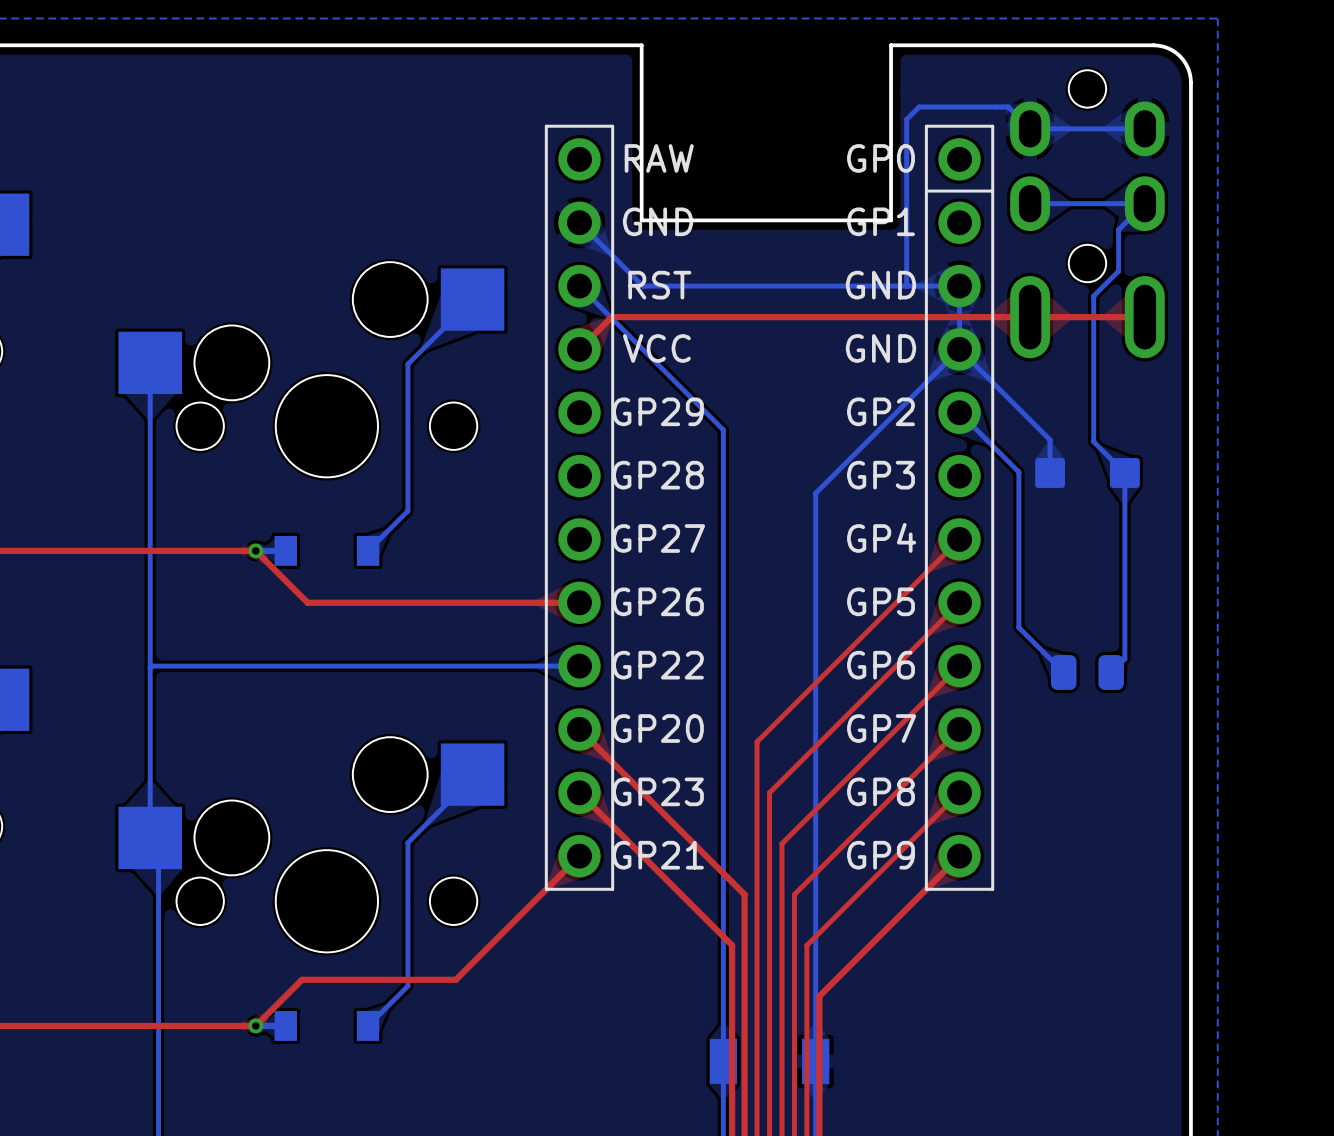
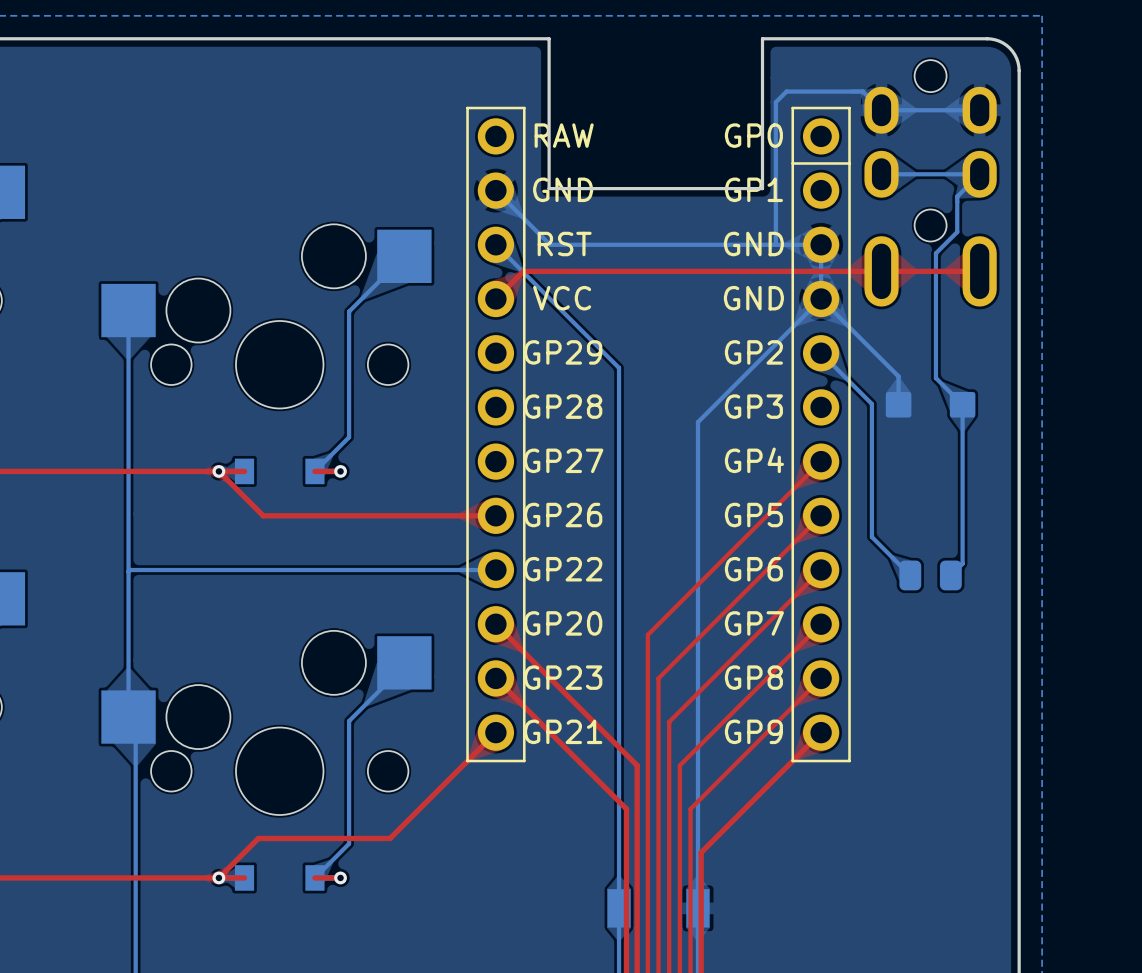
top track: none -> (218, 471) (244, 471)
top track: none -> (314, 471) (340, 471)
via: none -> (340, 471)
top track: none -> (218, 877) (244, 877)
top track: none -> (314, 877) (340, 877)
via: none -> (340, 877)

